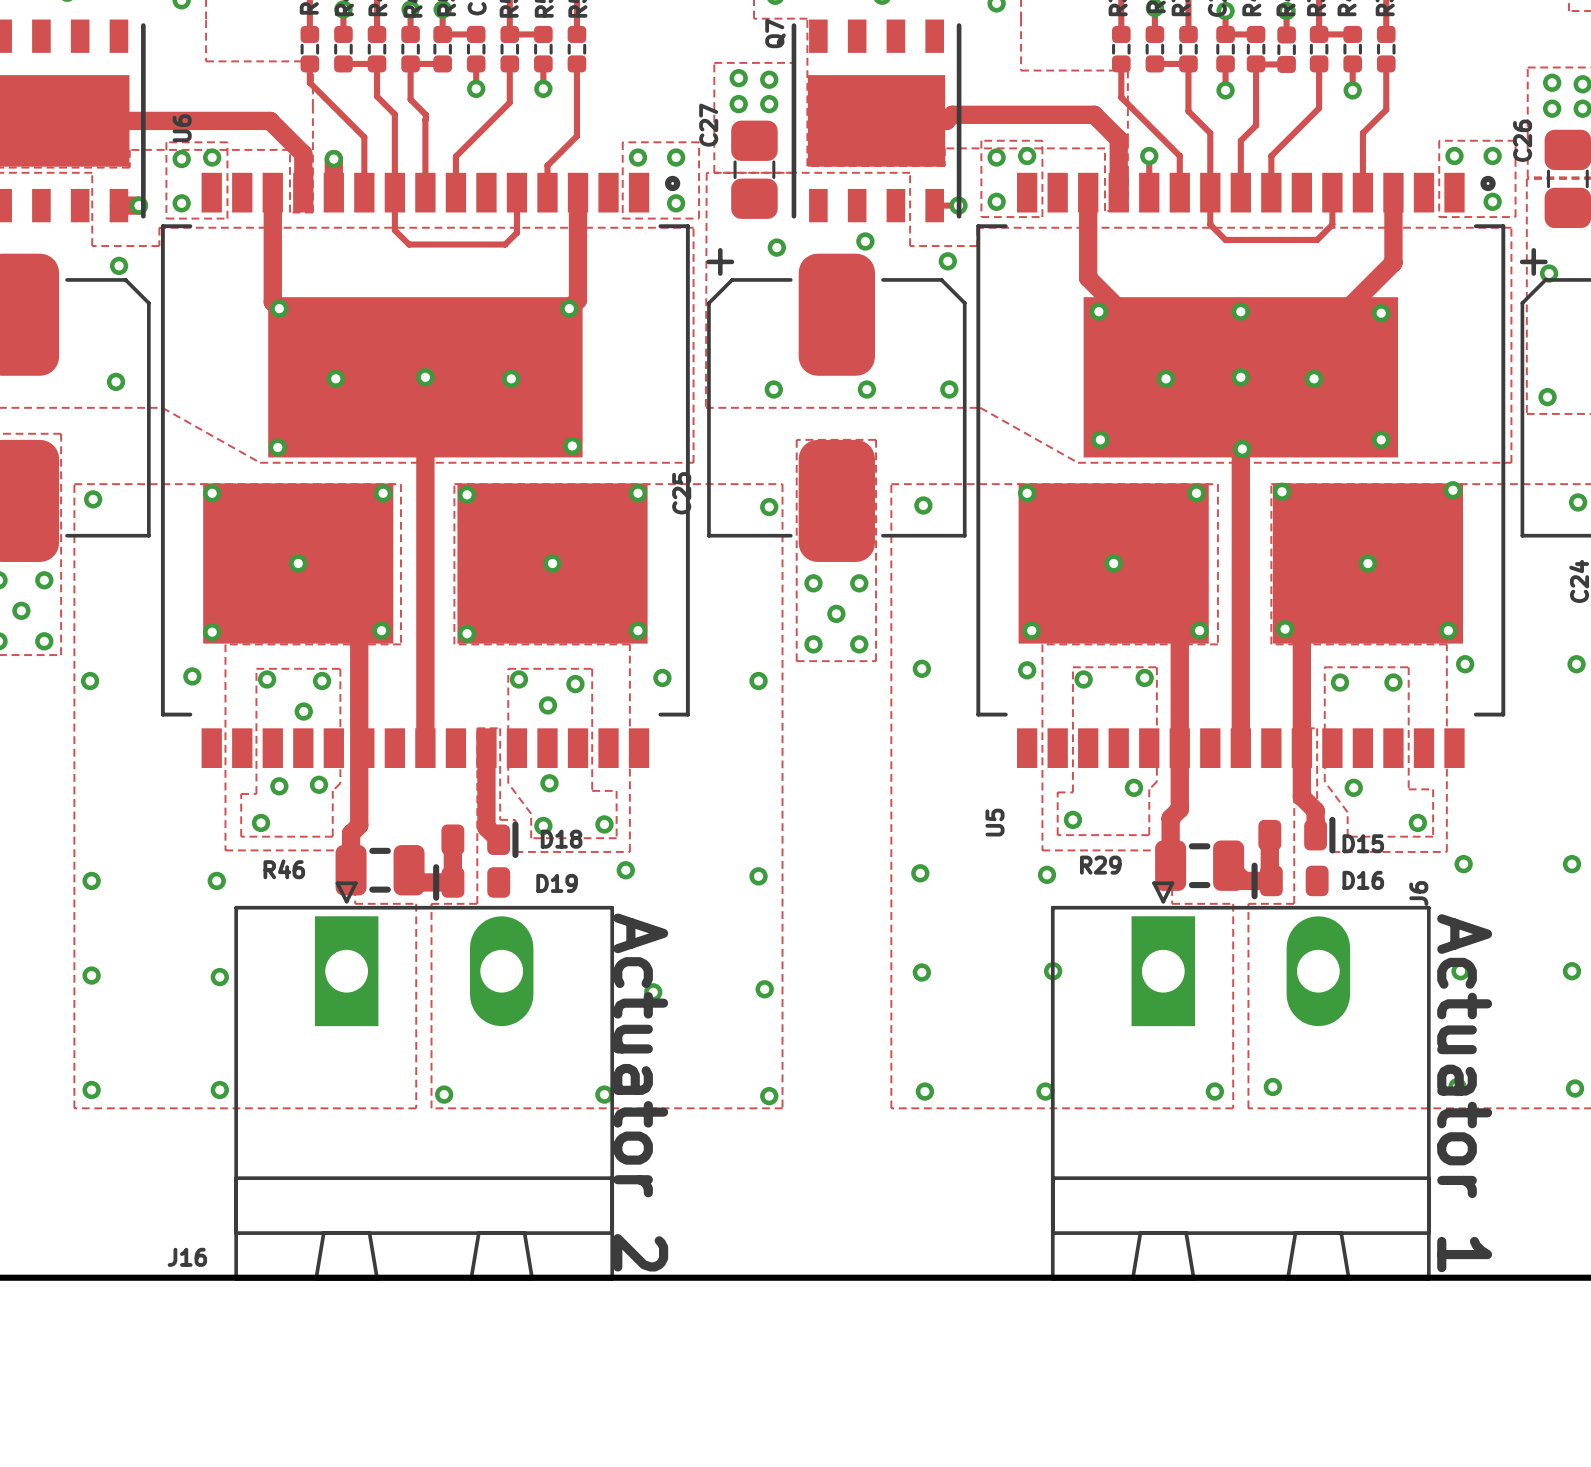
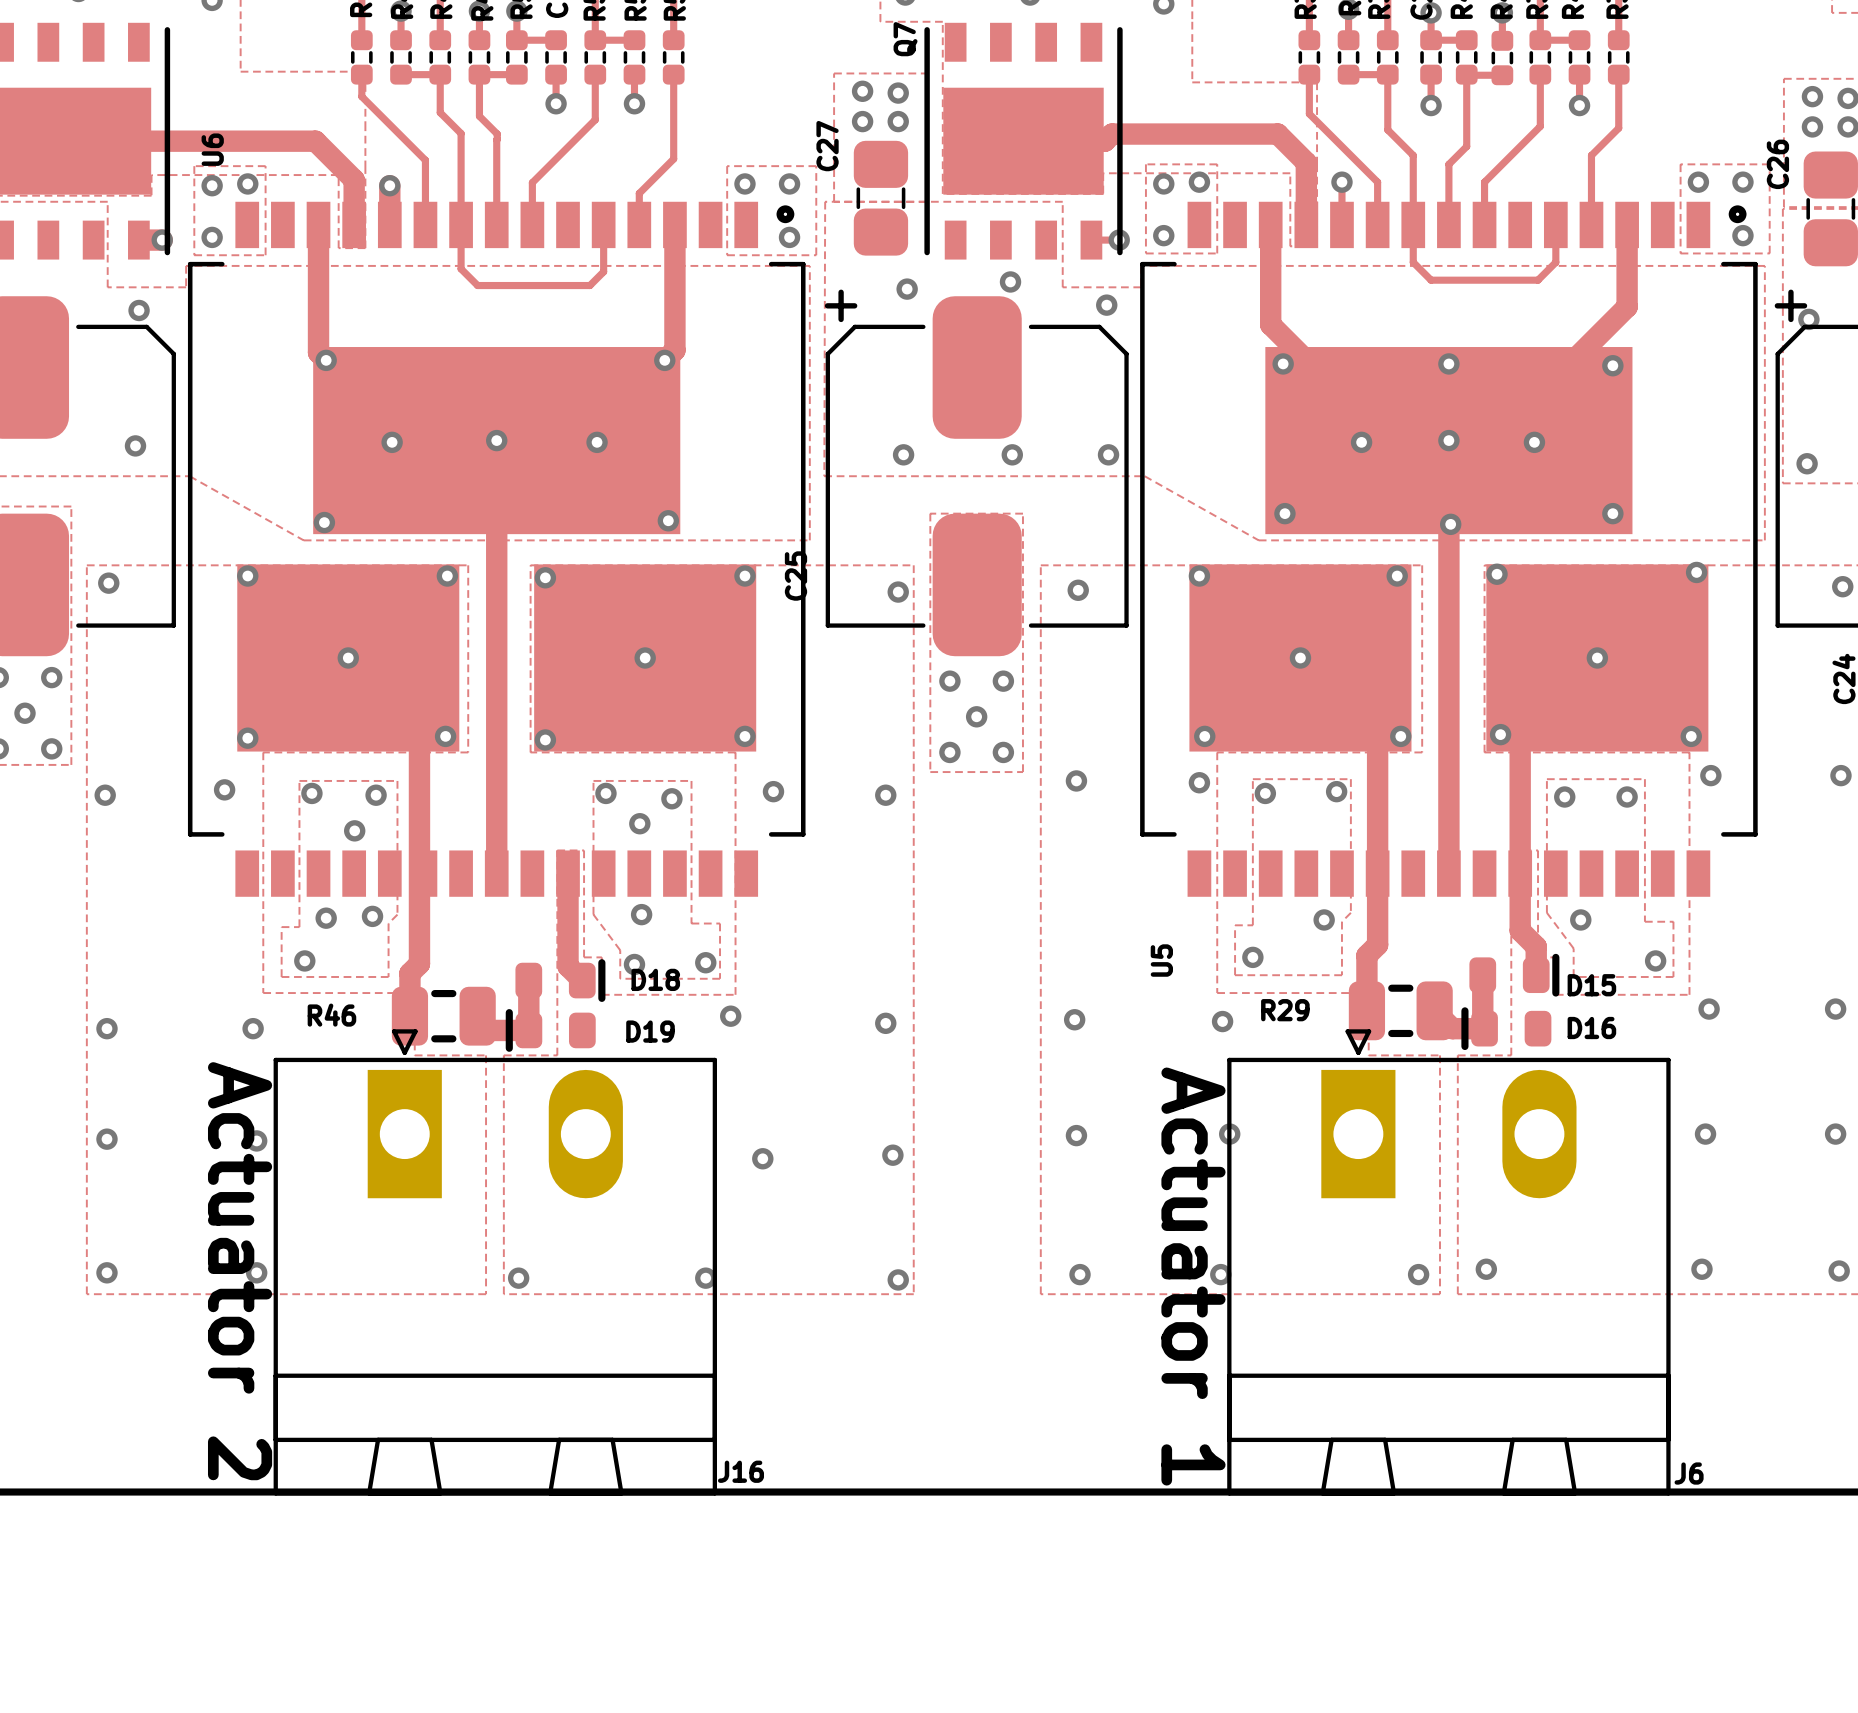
J6 name rotation: 0° (1418, 893) -> 90° clockwise (1689, 1473)
J6 name position: J6 (1418, 893) -> J6 (1689, 1473)
text position: Actuator 2 (640, 1092) -> Actuator 2 (240, 1271)
text position: Actuator 1 (1464, 1093) -> Actuator 1 (1193, 1276)
J16 name position: J16 (187, 1257) -> J16 (740, 1471)

